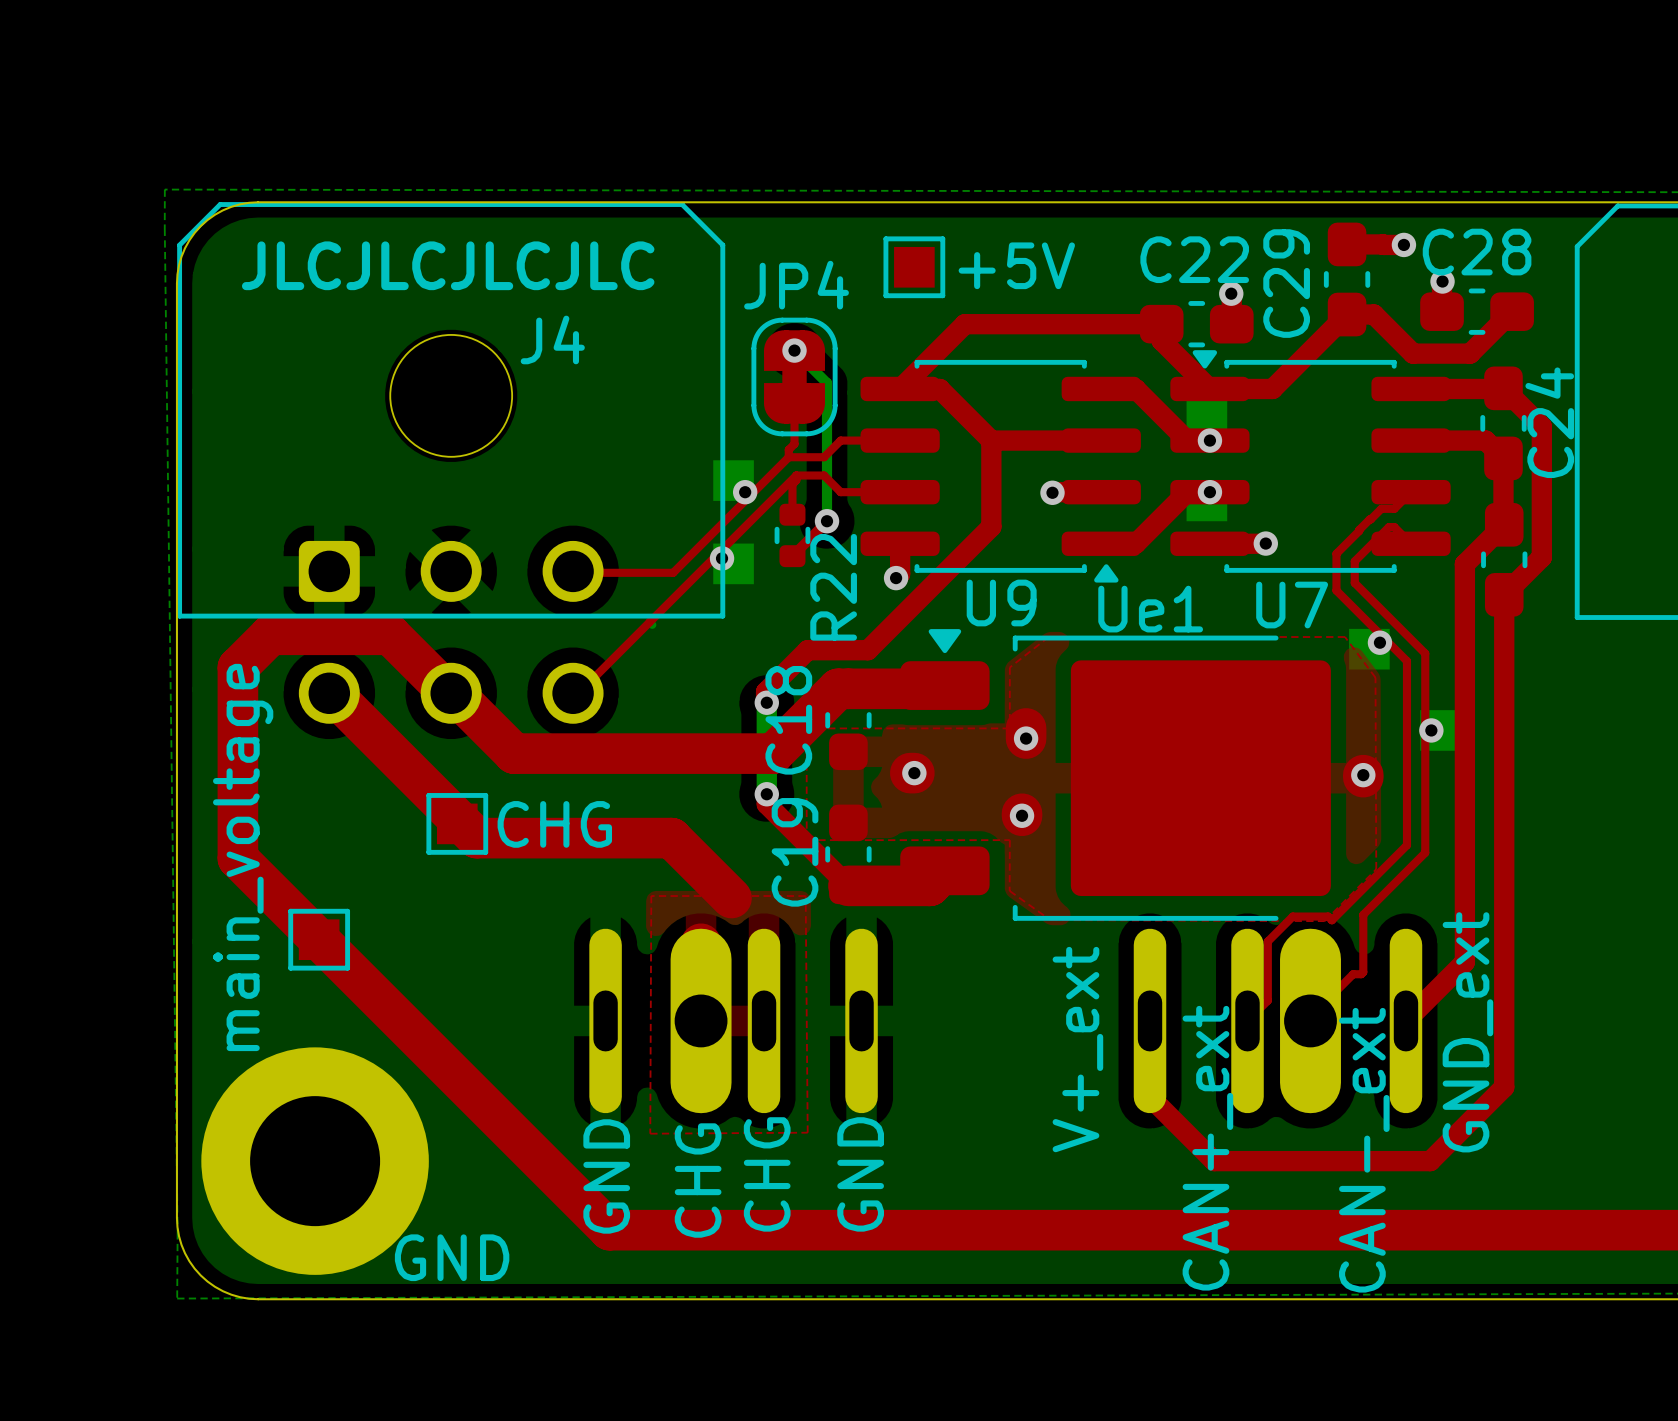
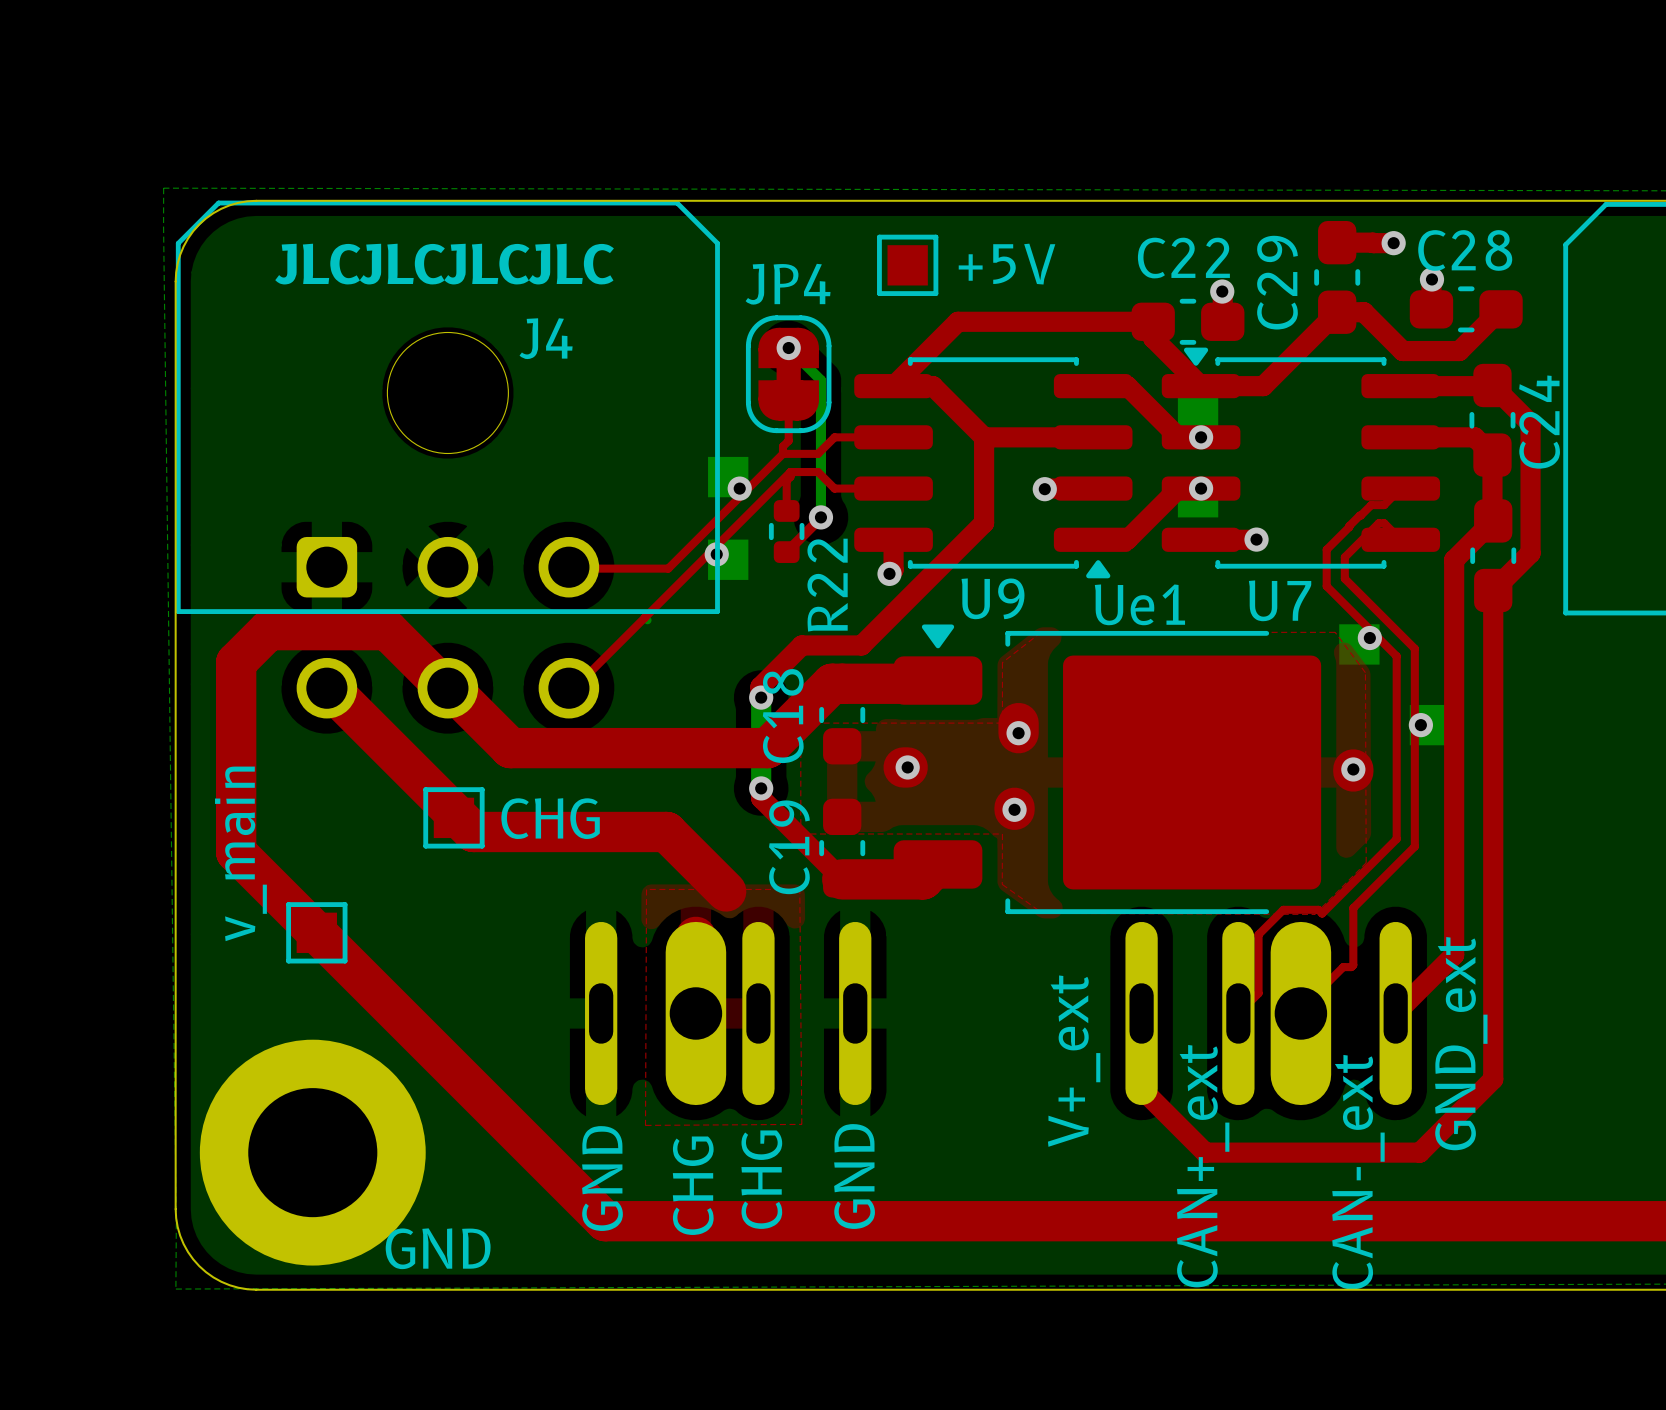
main_voltage name: main_voltage (243, 857) -> v_main (240, 853)

